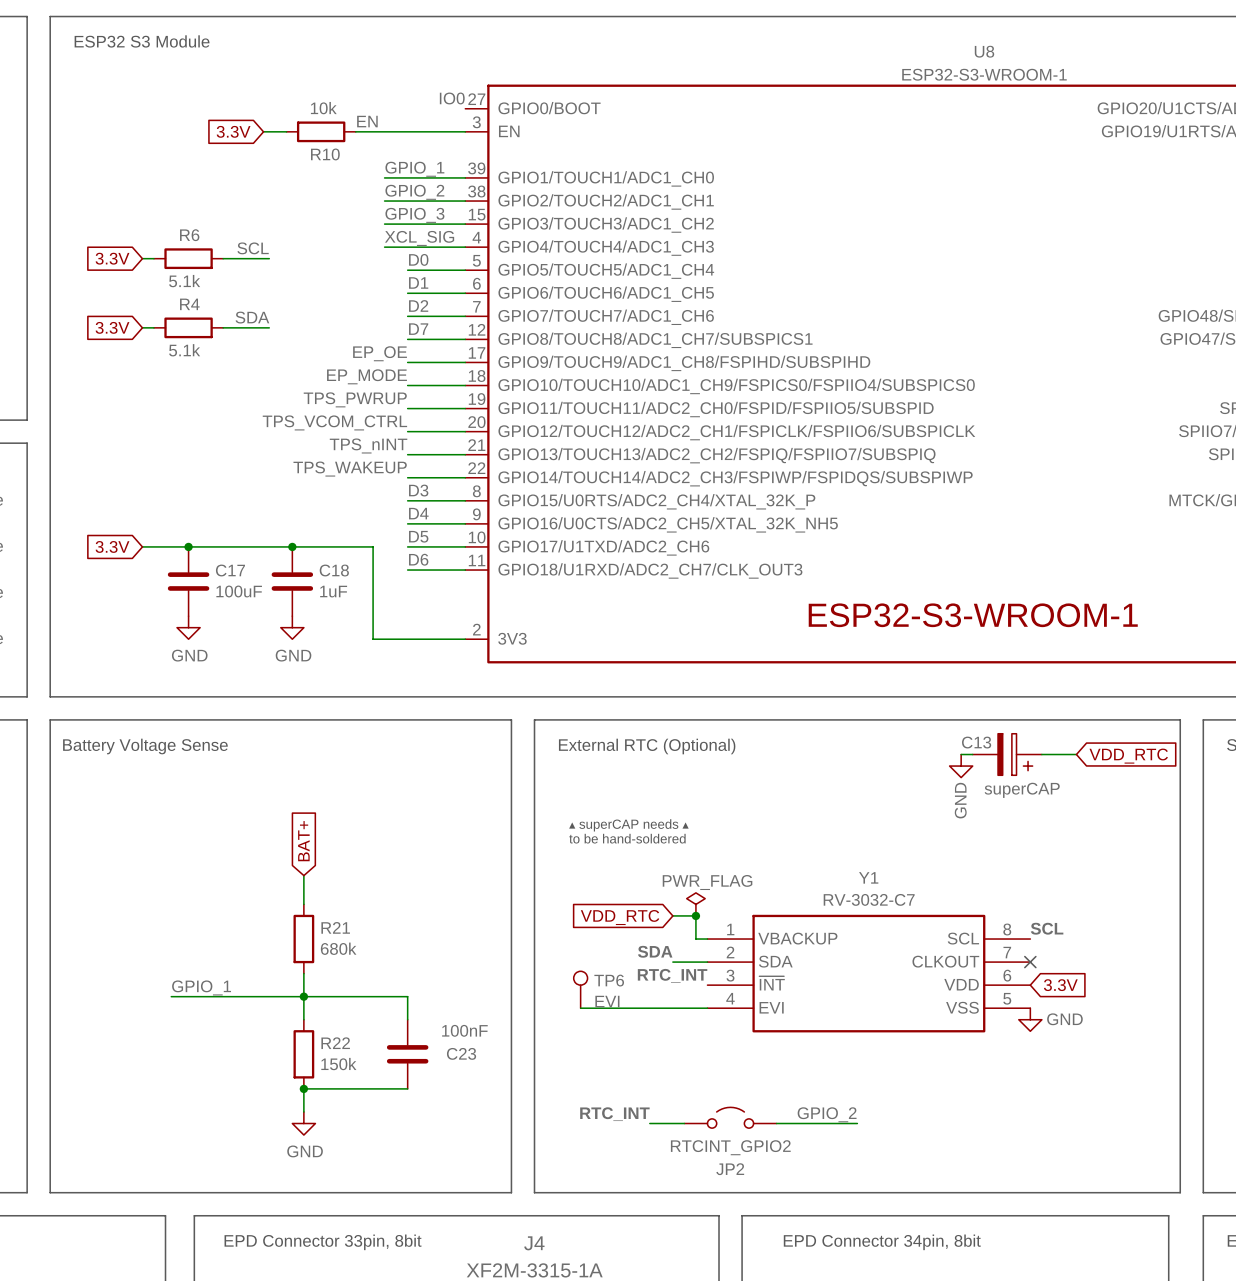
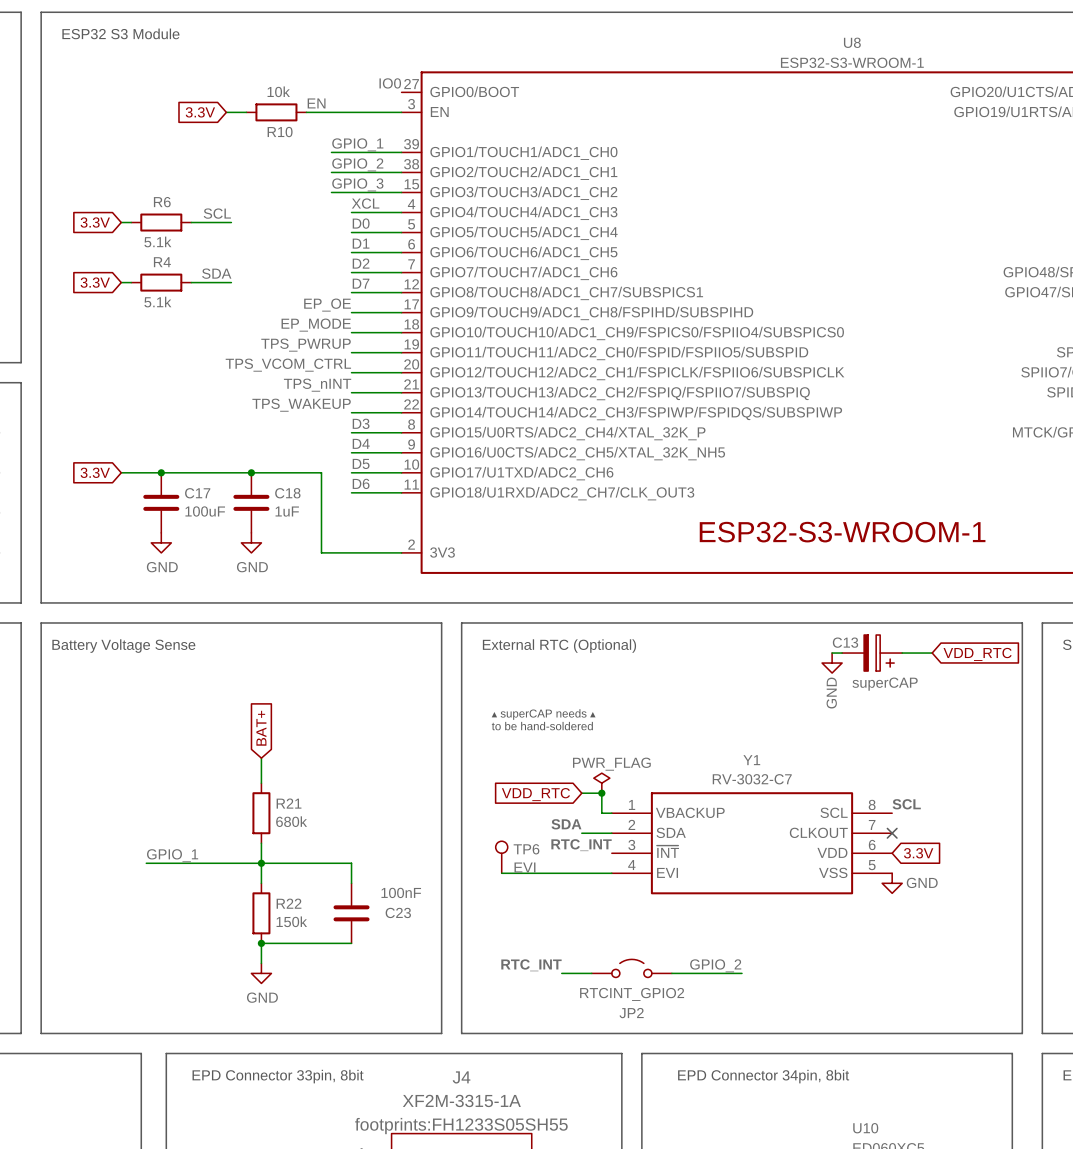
label: none -> XCL (365, 203)
label: XCL_SIG (419, 238) -> none
wire: (384, 247) (407, 247) -> none

